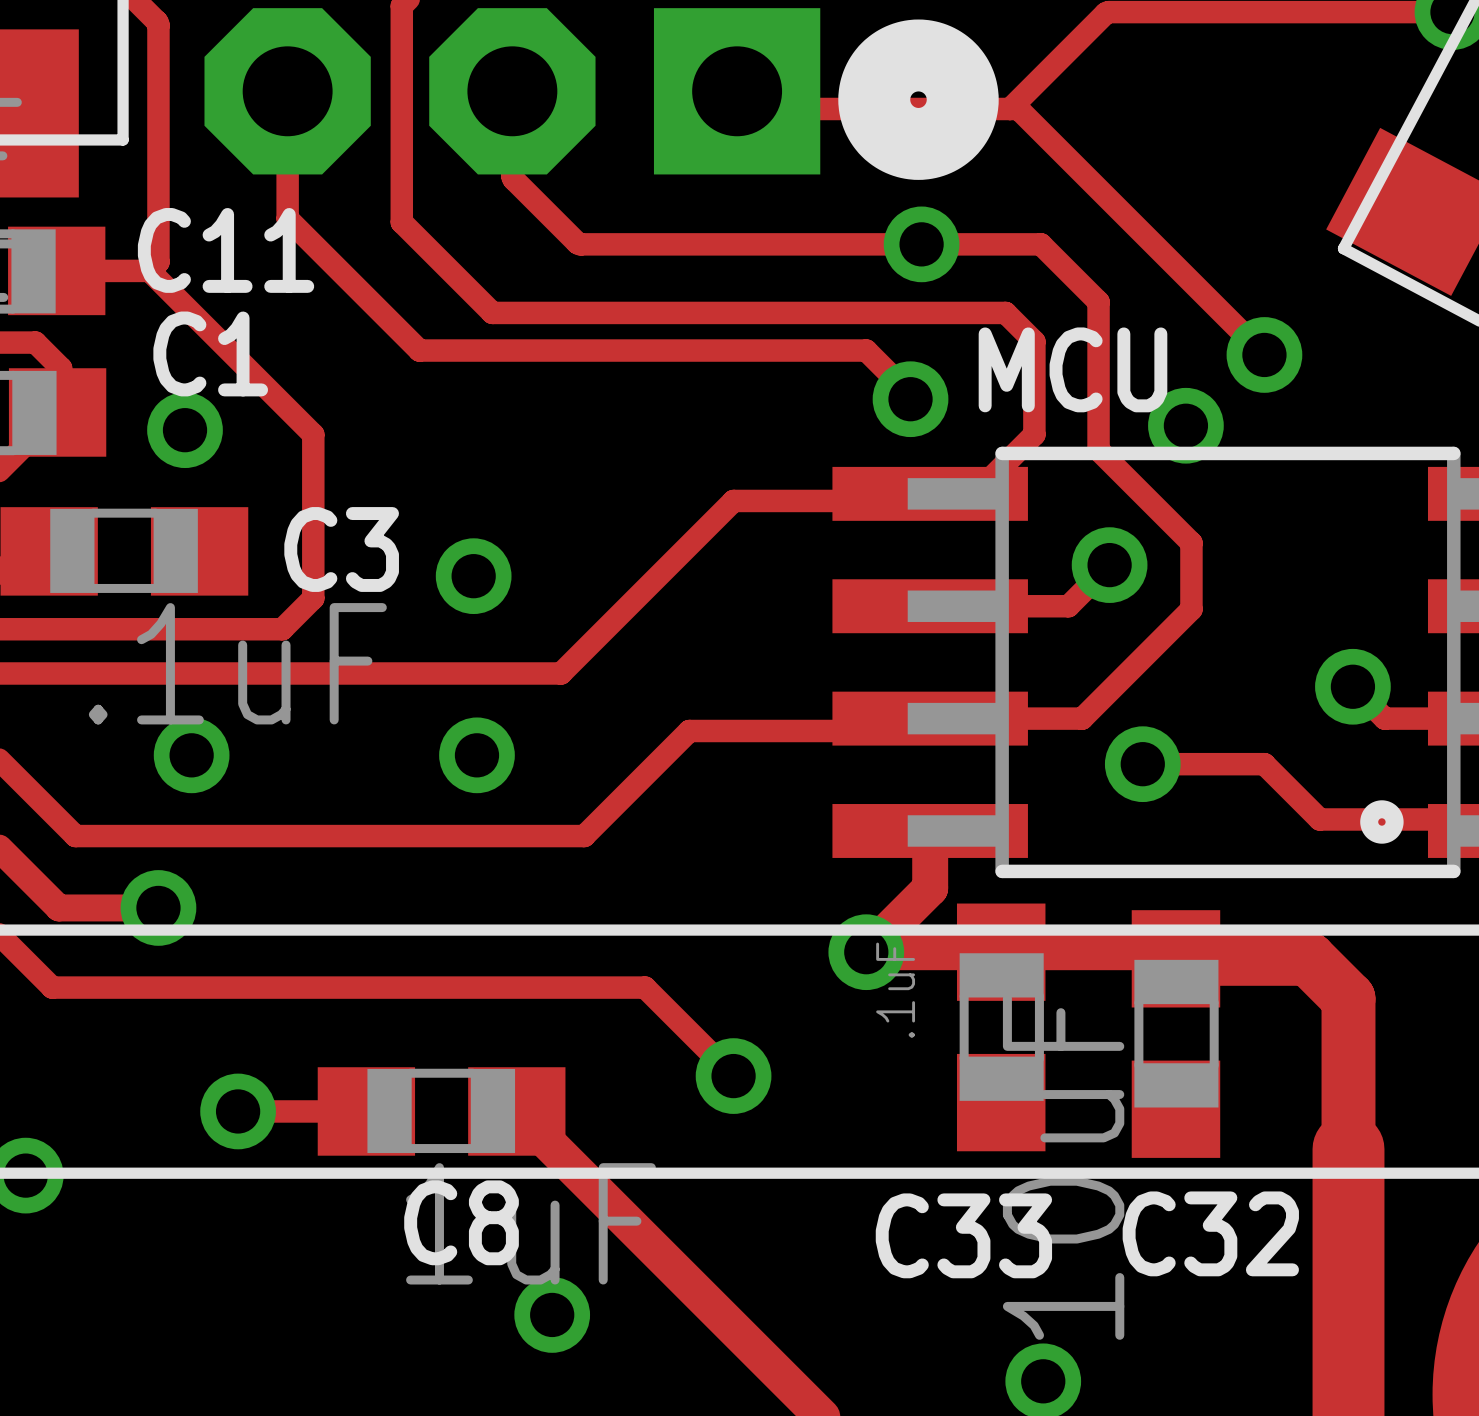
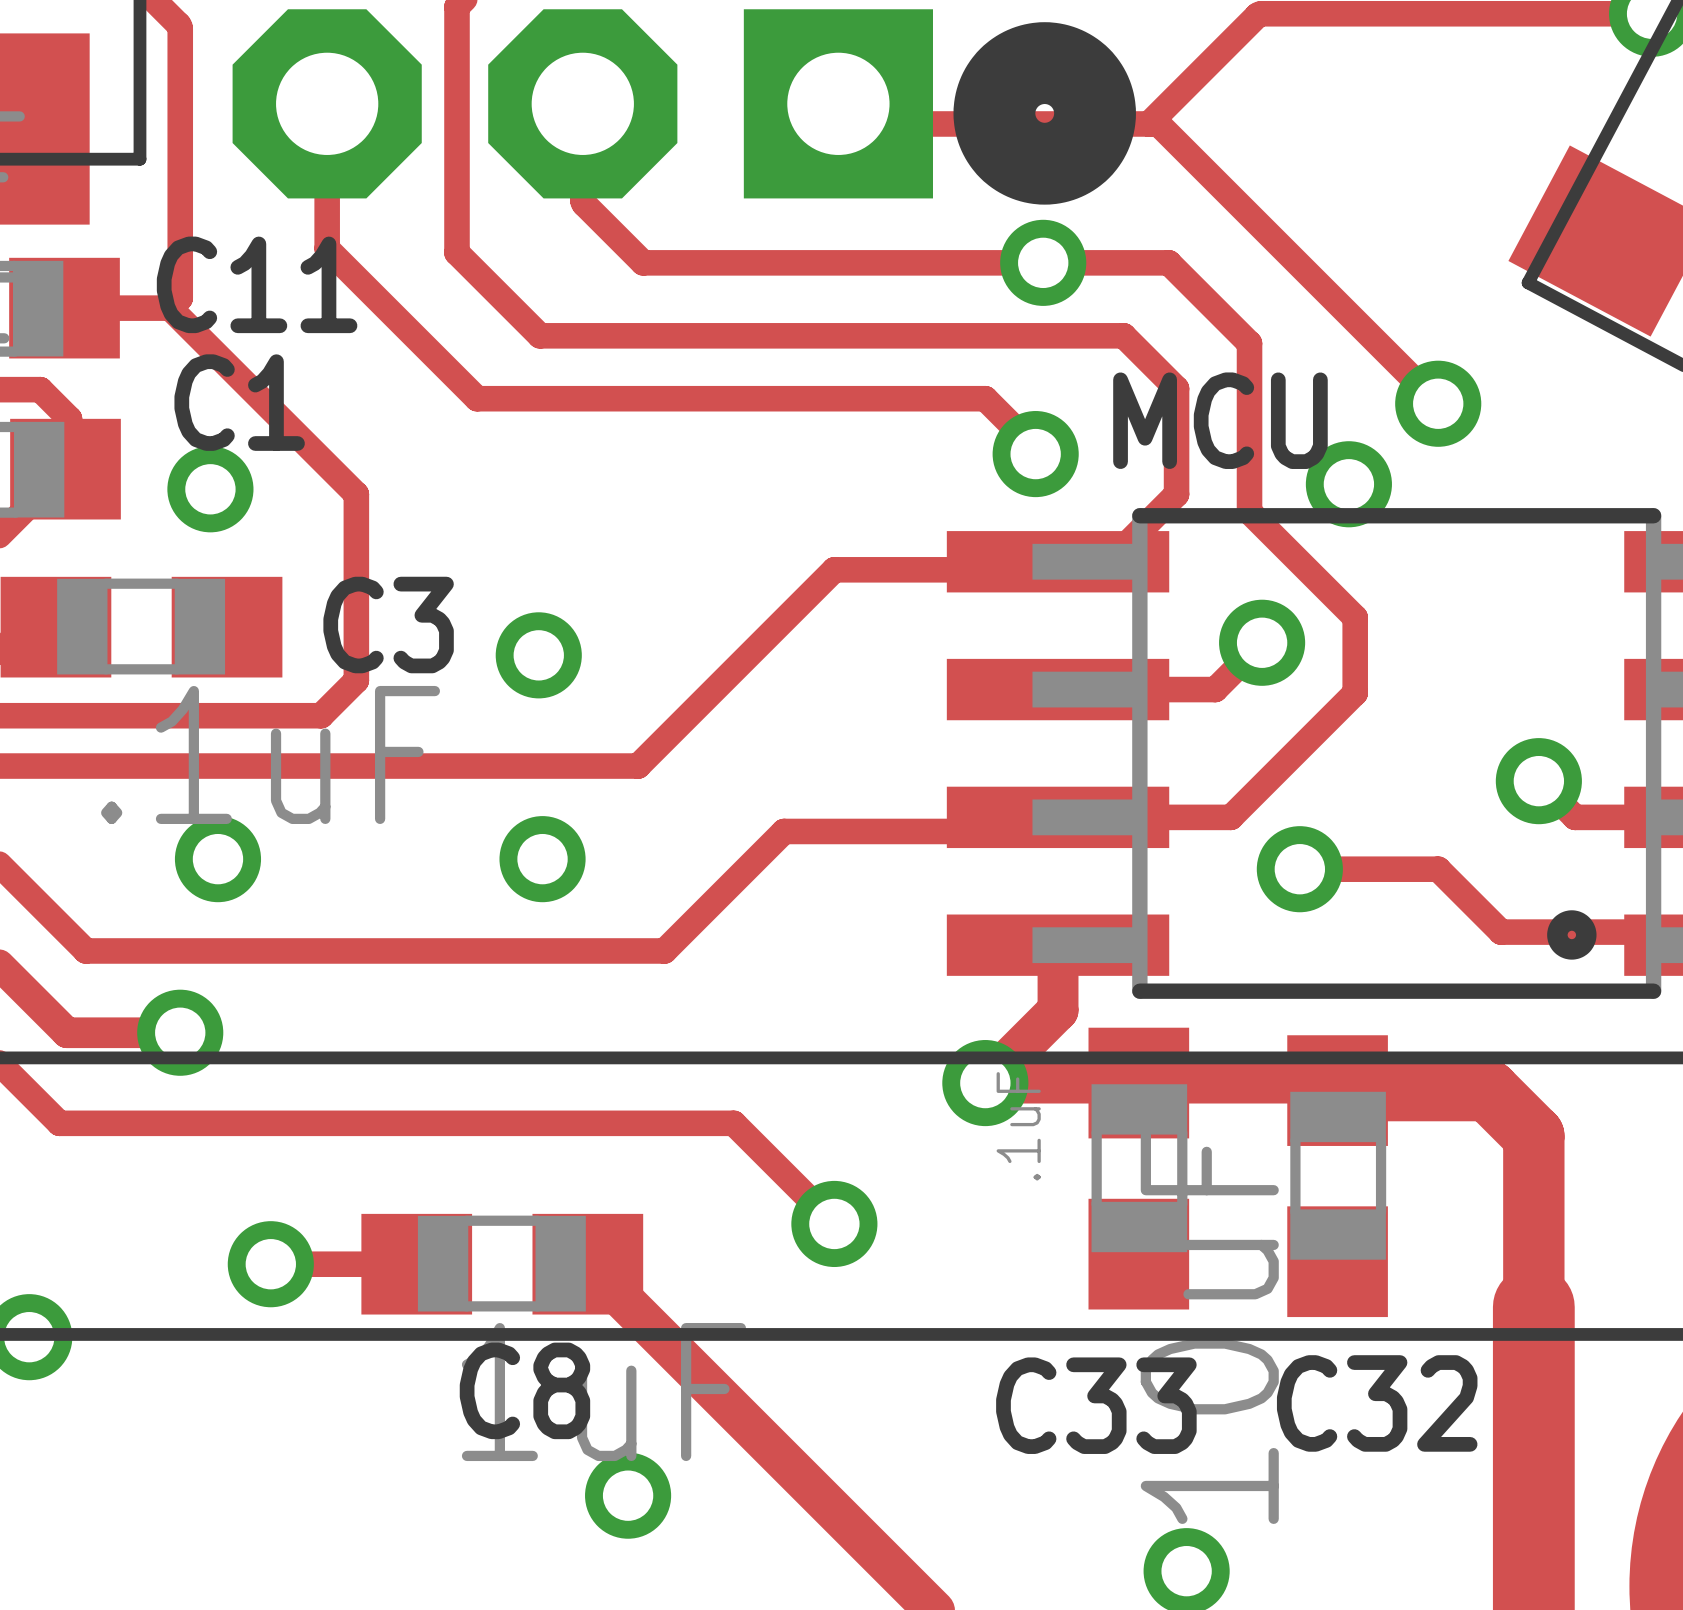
track: (565, 231) (581, 244) (1040, 244) -> (643, 262) (1168, 262) (1184, 277)
via position: (921, 244) -> (1043, 262)
track: (474, 295) (492, 312) (1005, 312) -> (540, 335) (1123, 335) (1143, 355)

